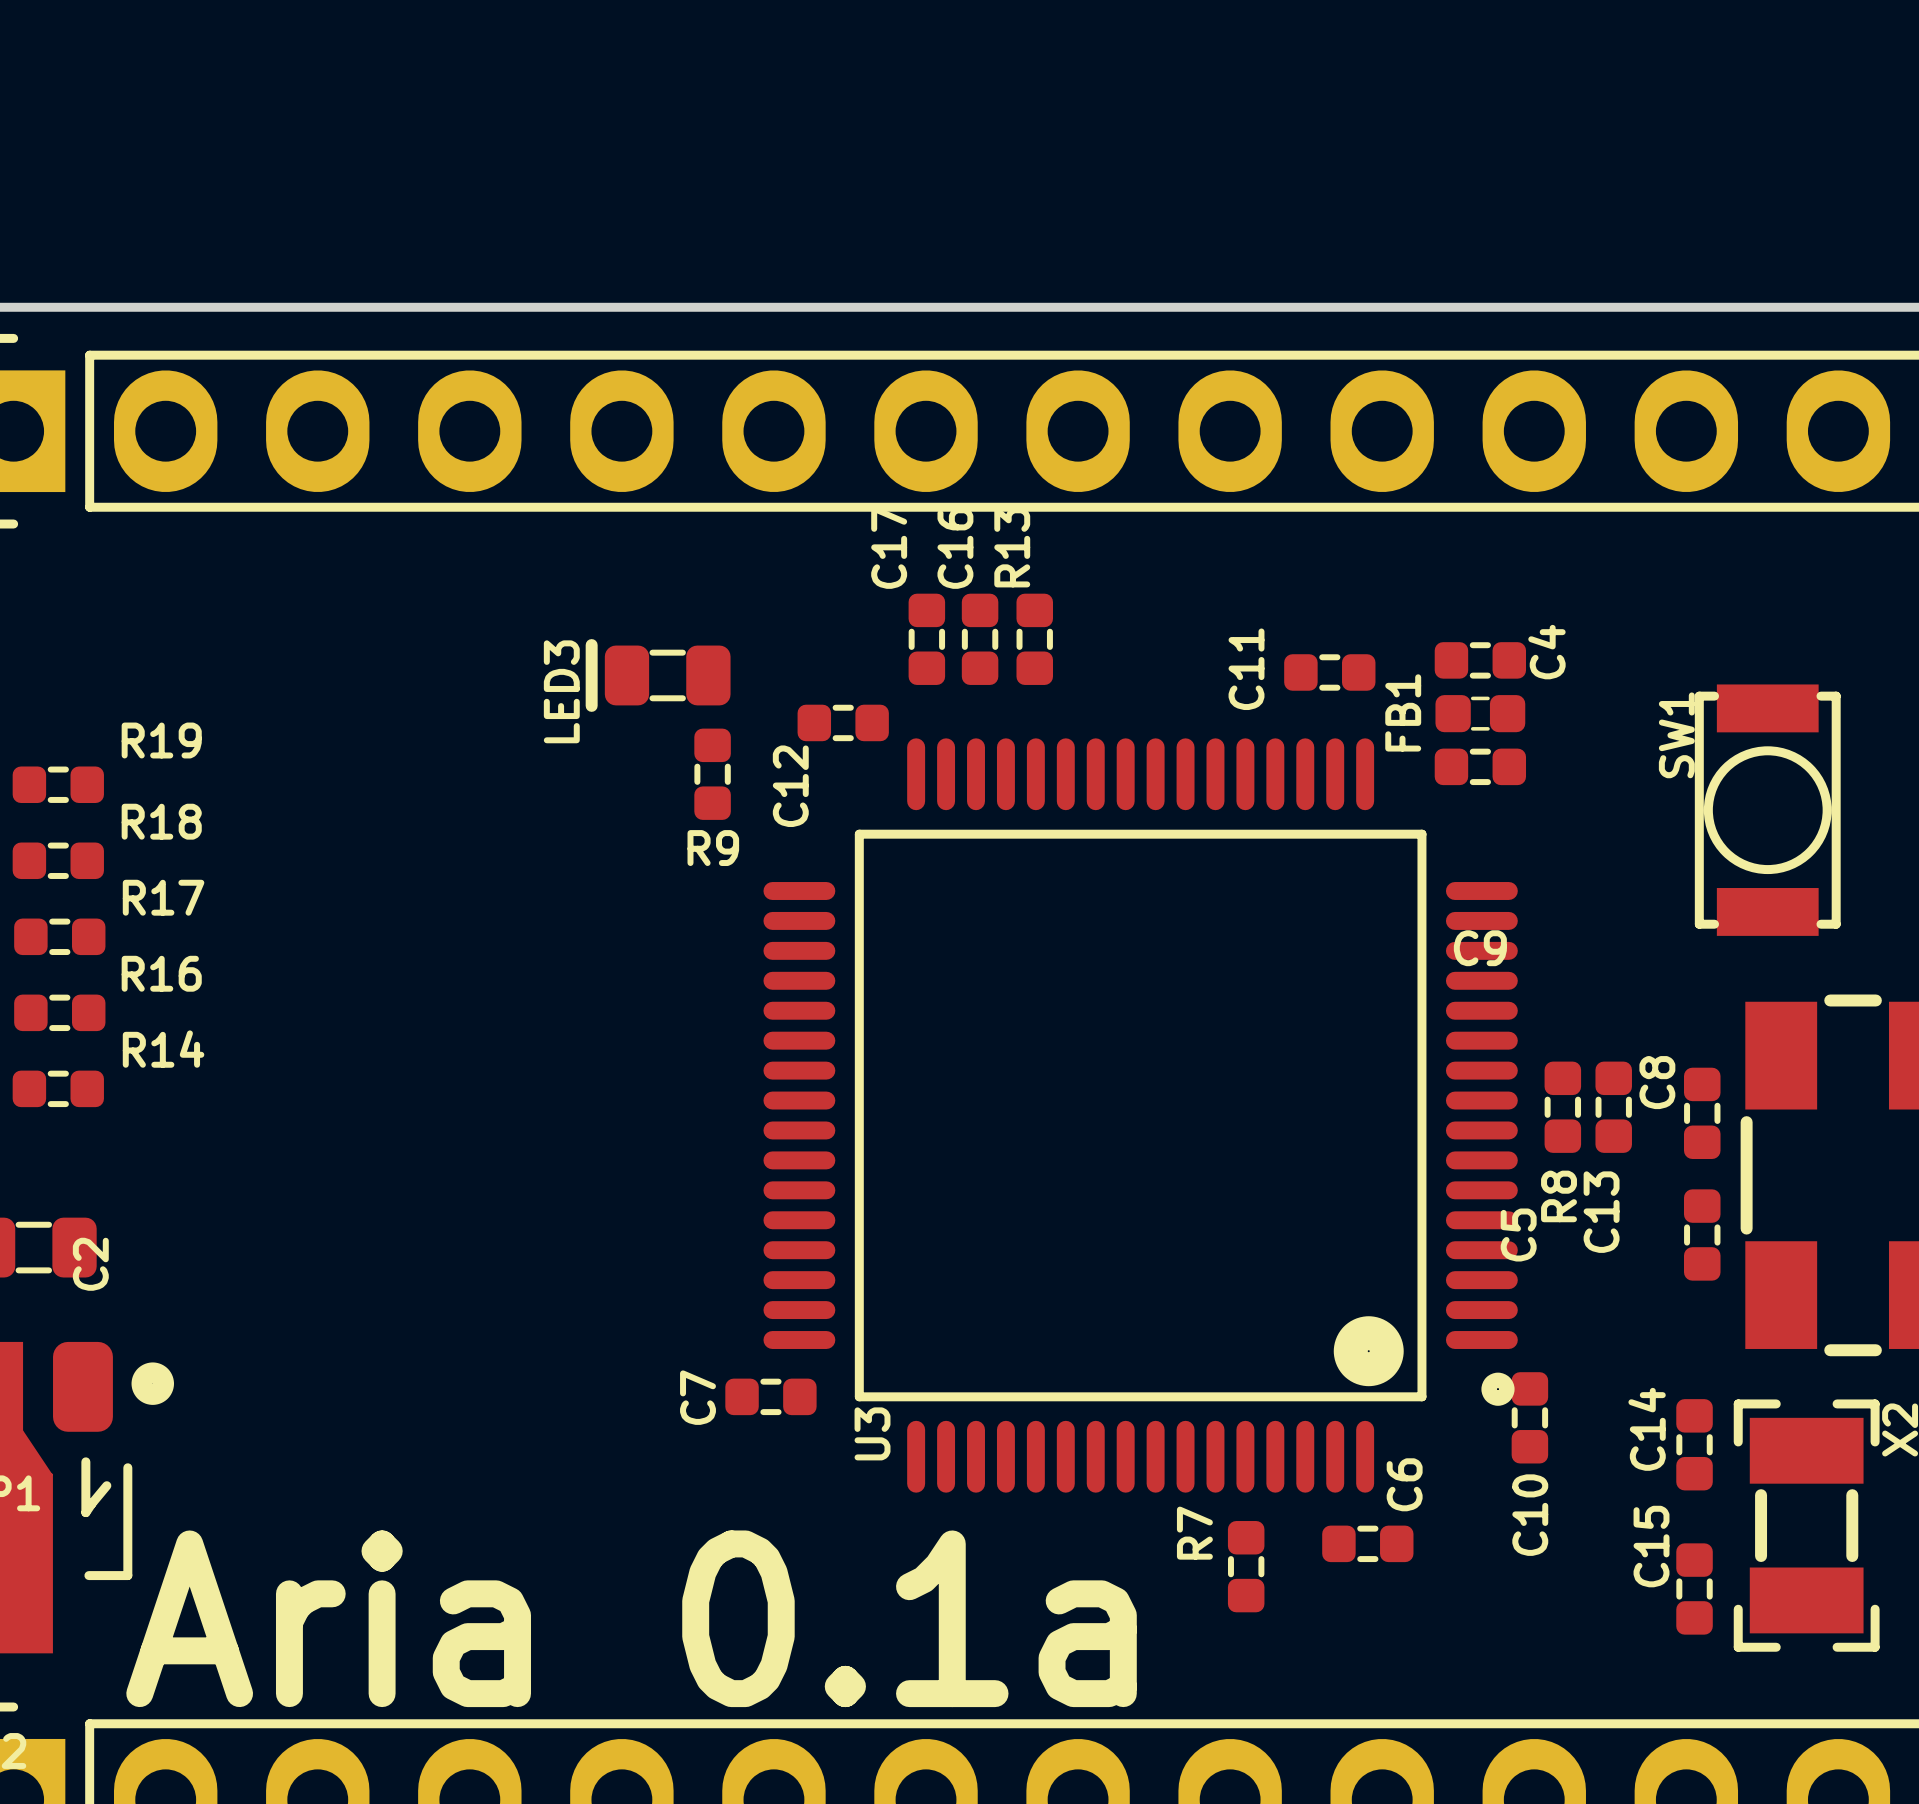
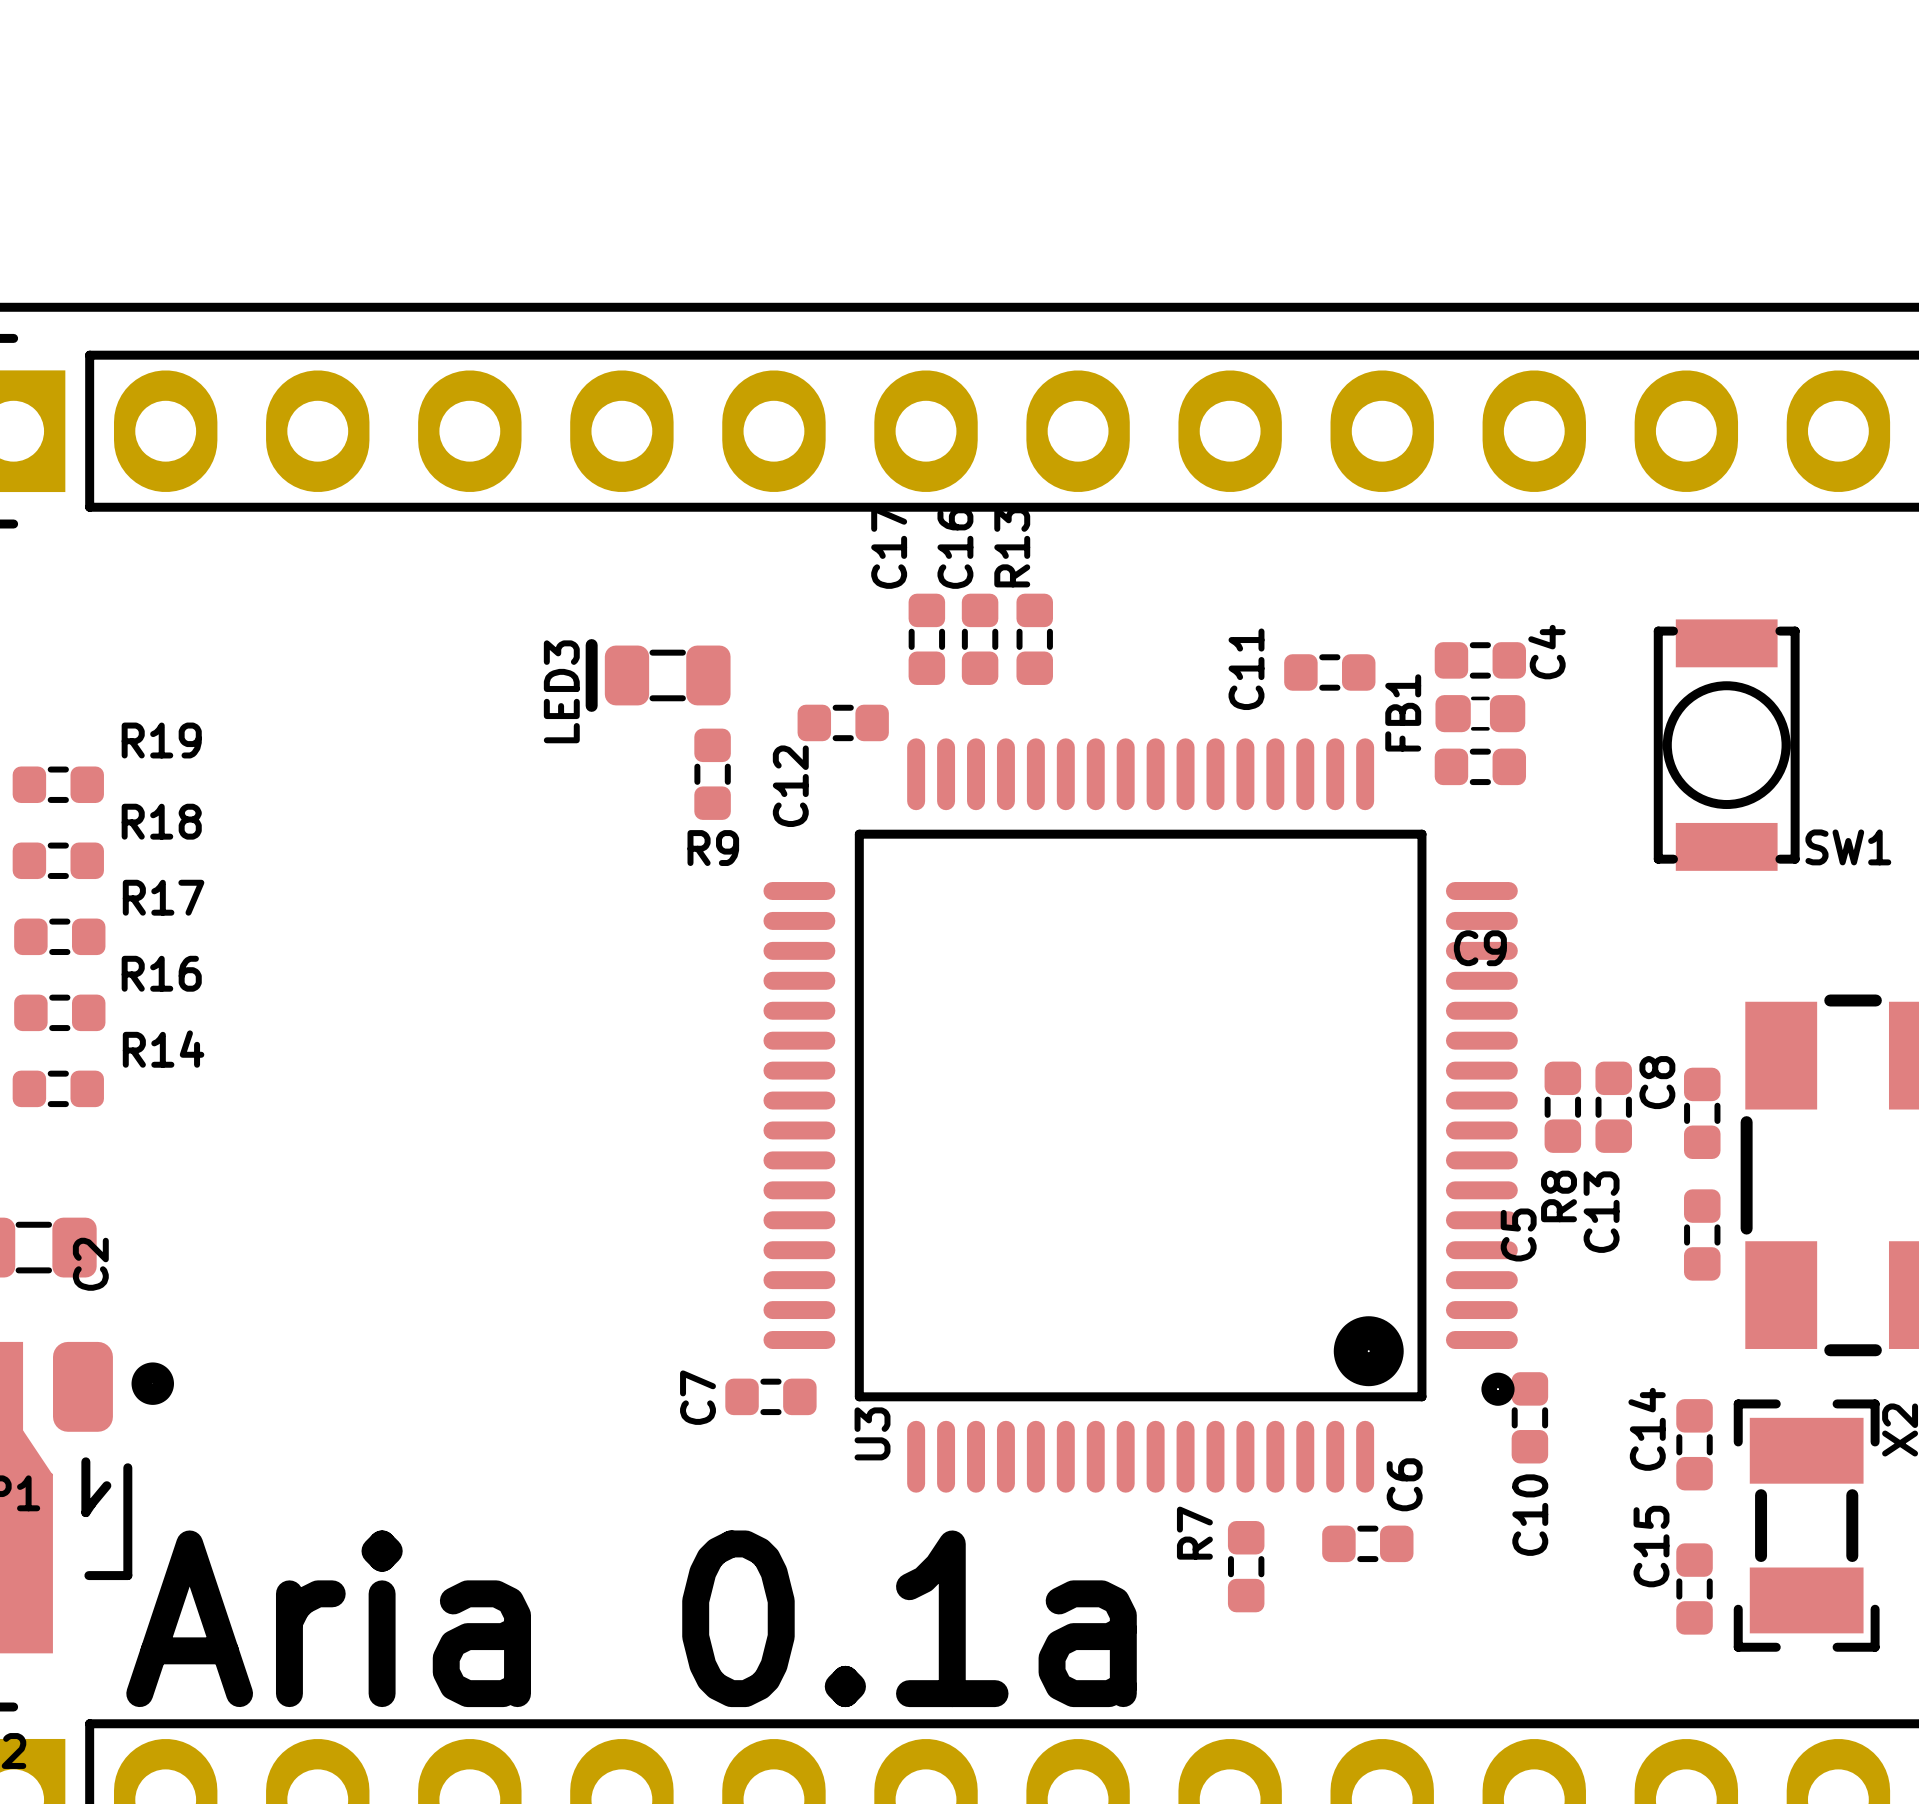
SW1 name rotation: 0° (1676, 735) -> 90° clockwise (1848, 847)
SW1 name position: SW1 (1676, 735) -> SW1 (1848, 847)
SW1 position: (1767, 810) -> (1726, 745)

